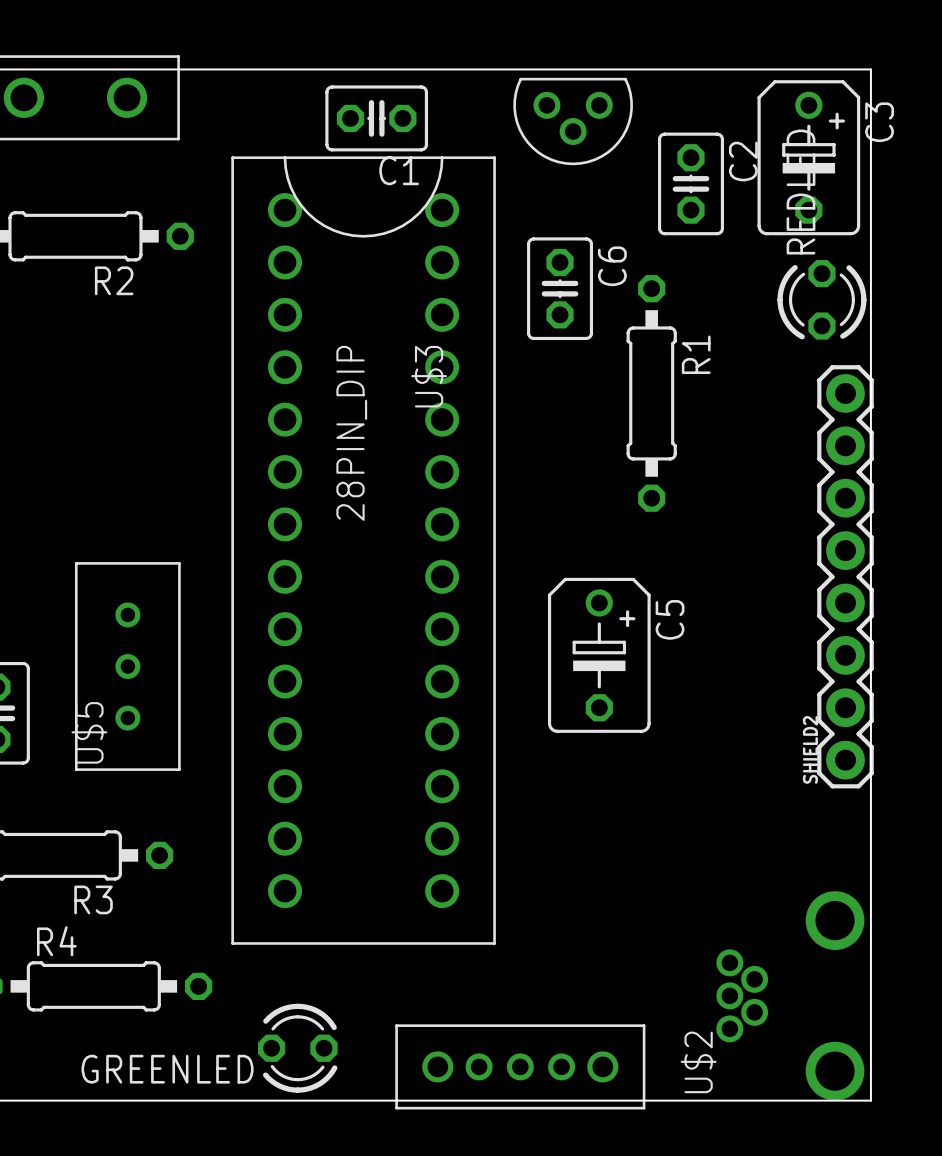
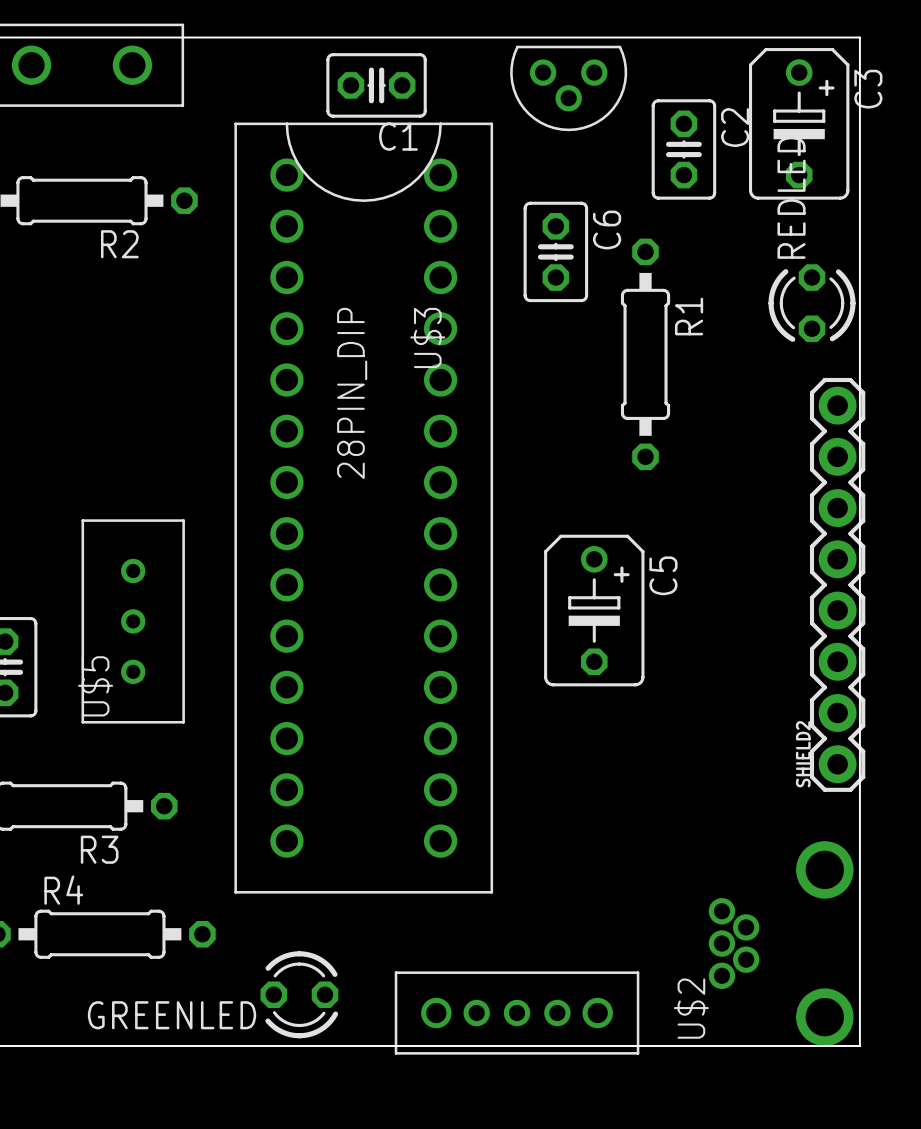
REDLED position: (821, 299) -> (812, 303)
SHIELD2 position: (845, 576) -> (837, 584)

